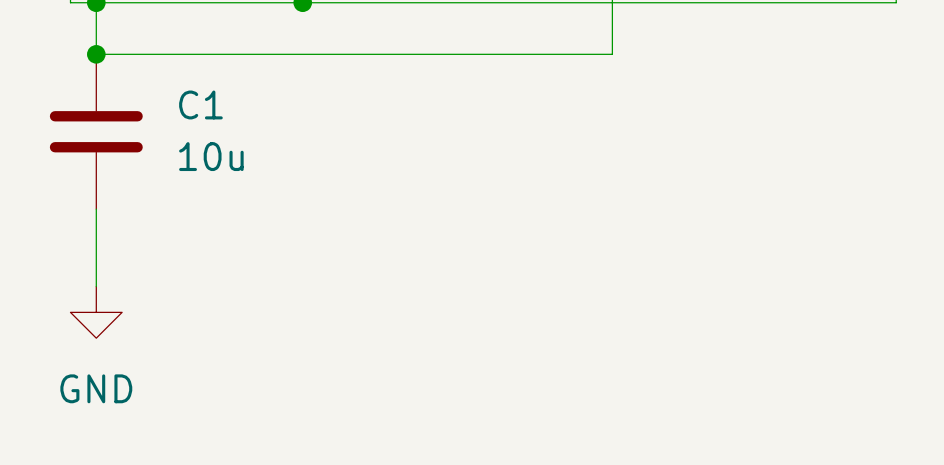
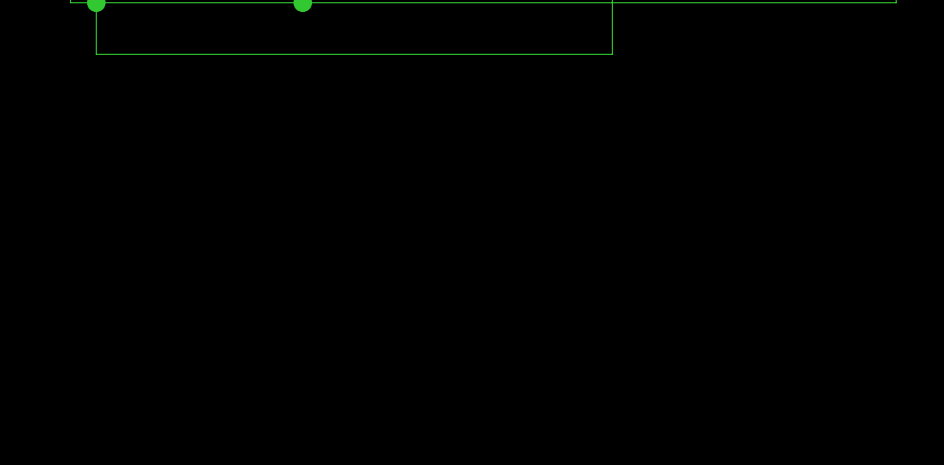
junction: (96, 54) -> none
C1: 10u (96, 131) -> none
wire: (96, 209) (96, 286) -> none
power symbol: GND (96, 312) -> none

